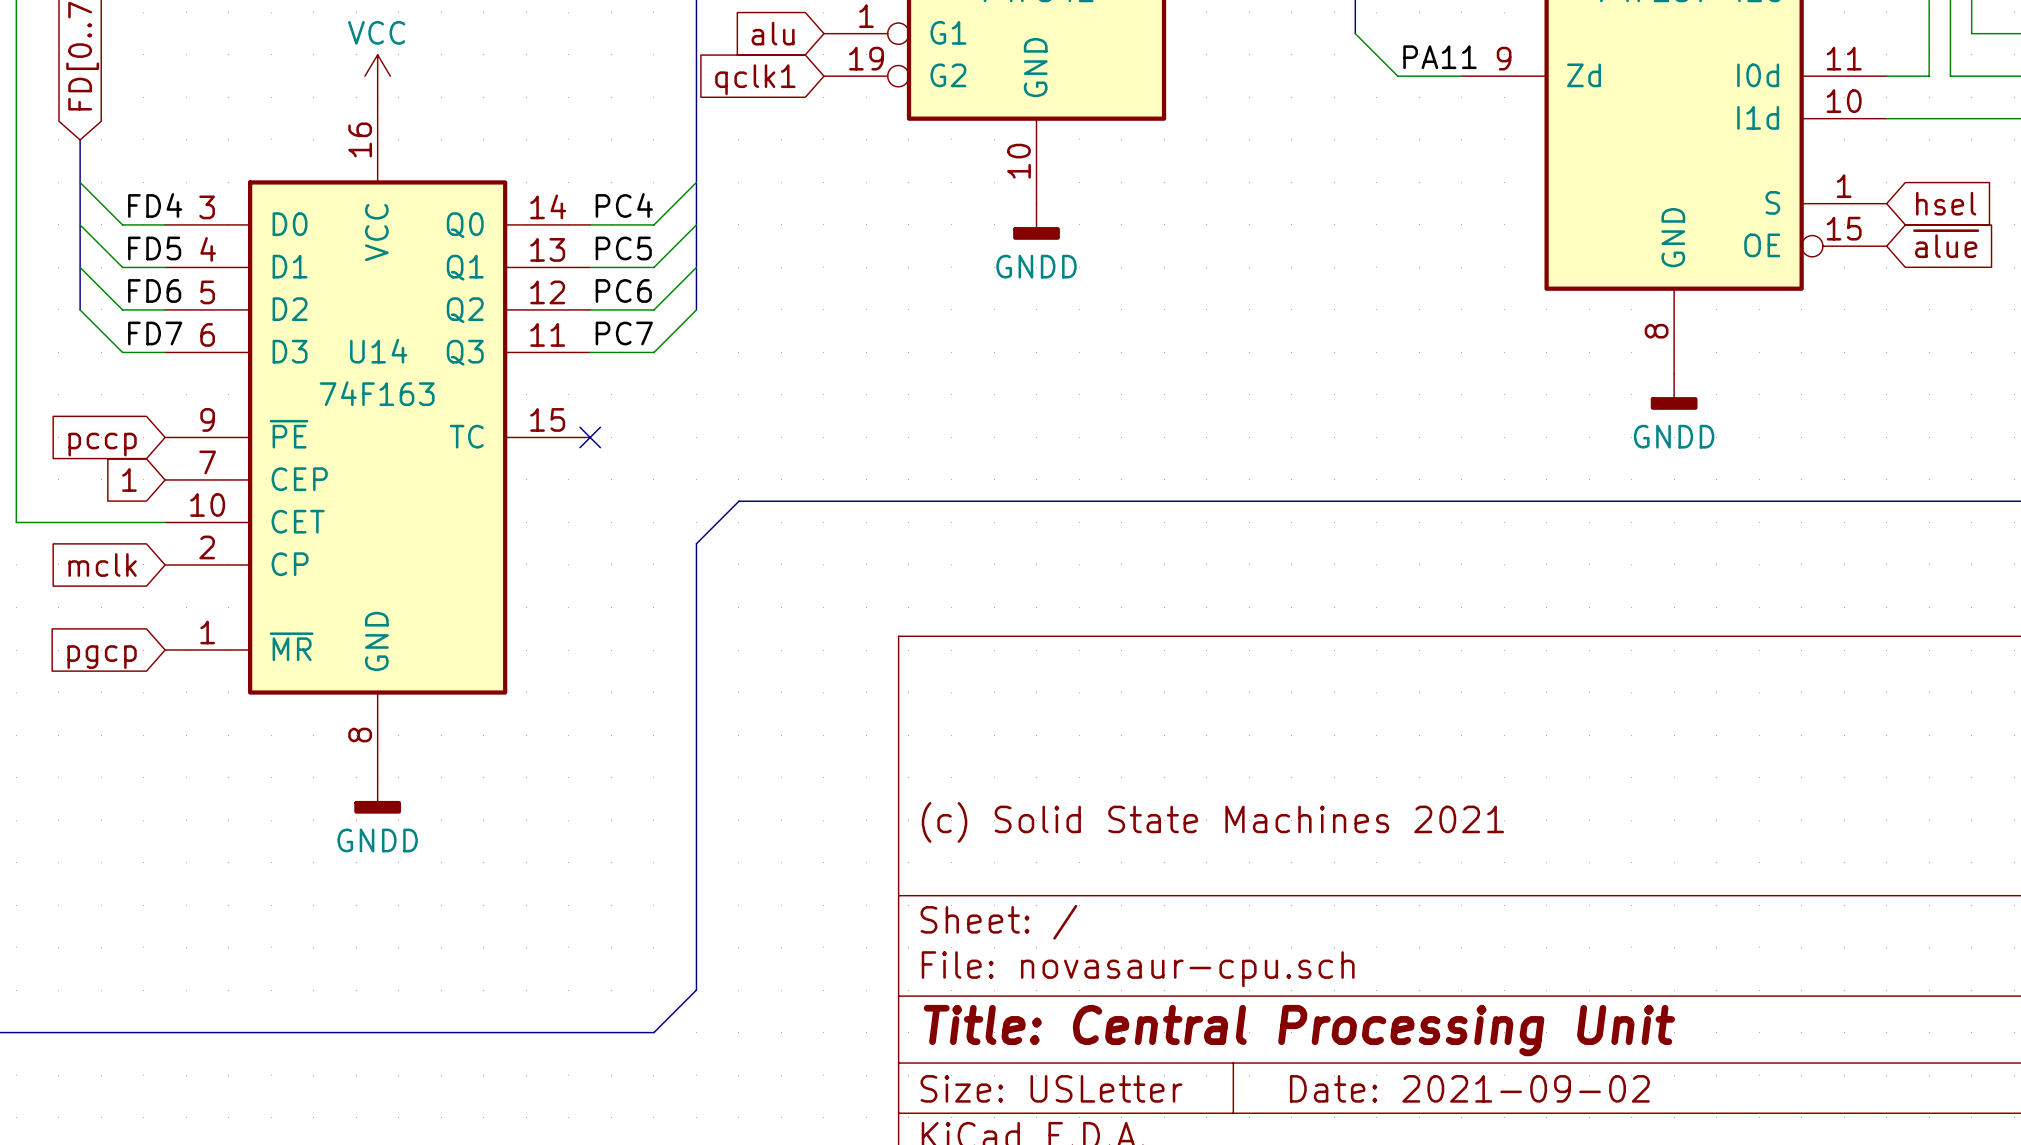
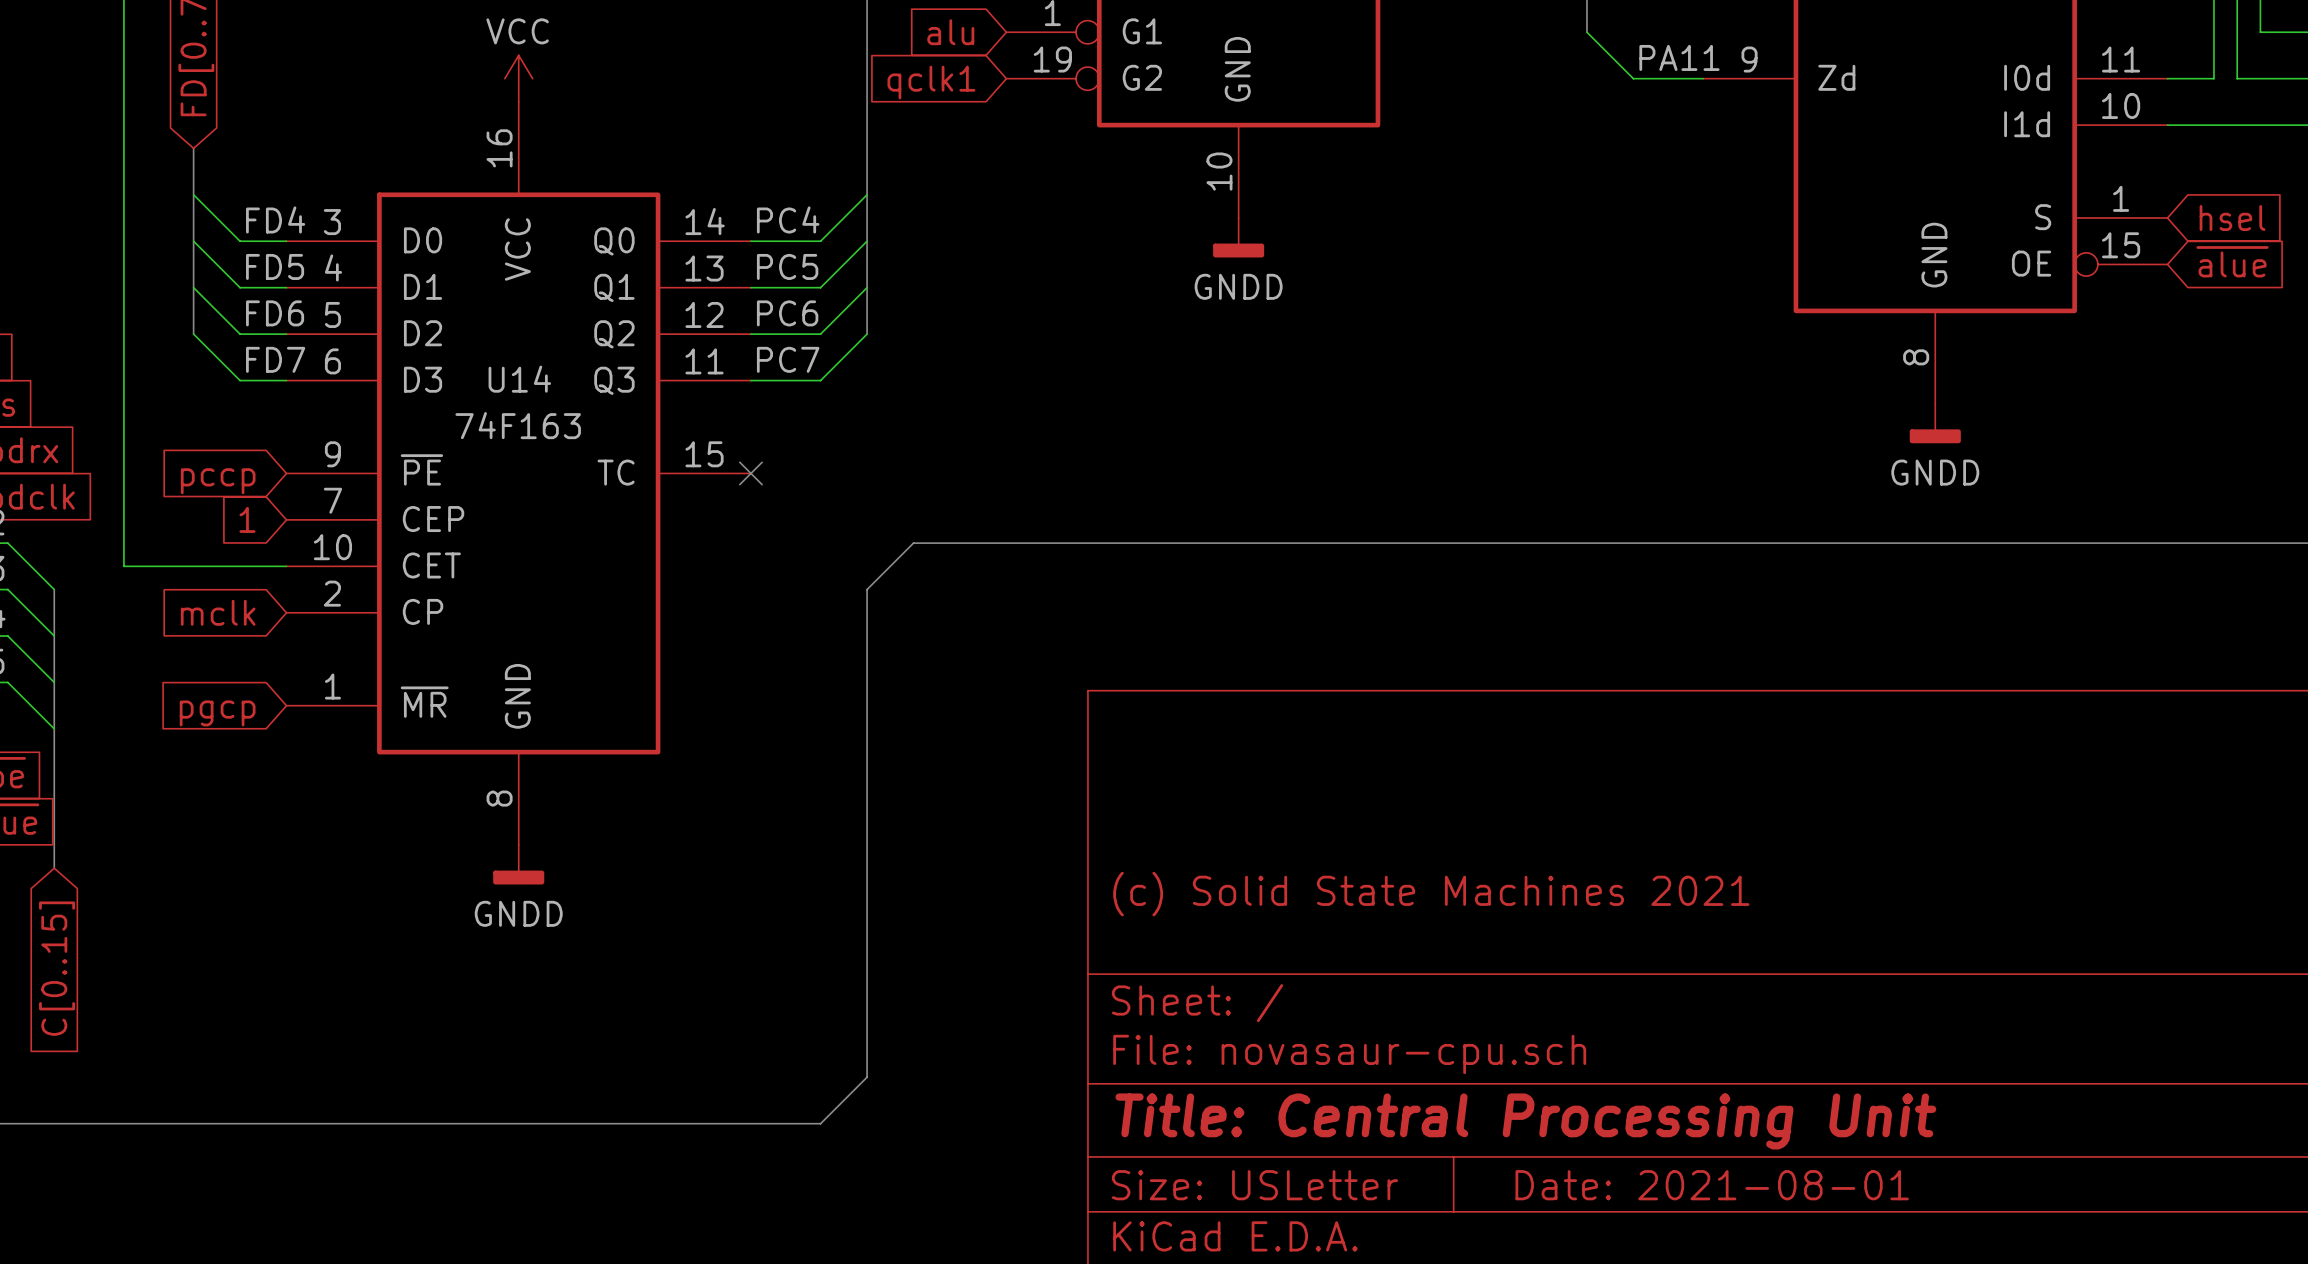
title block: Date: 2021-09-02 (1469, 1088) -> Date: 2021-08-01 (1712, 1185)

